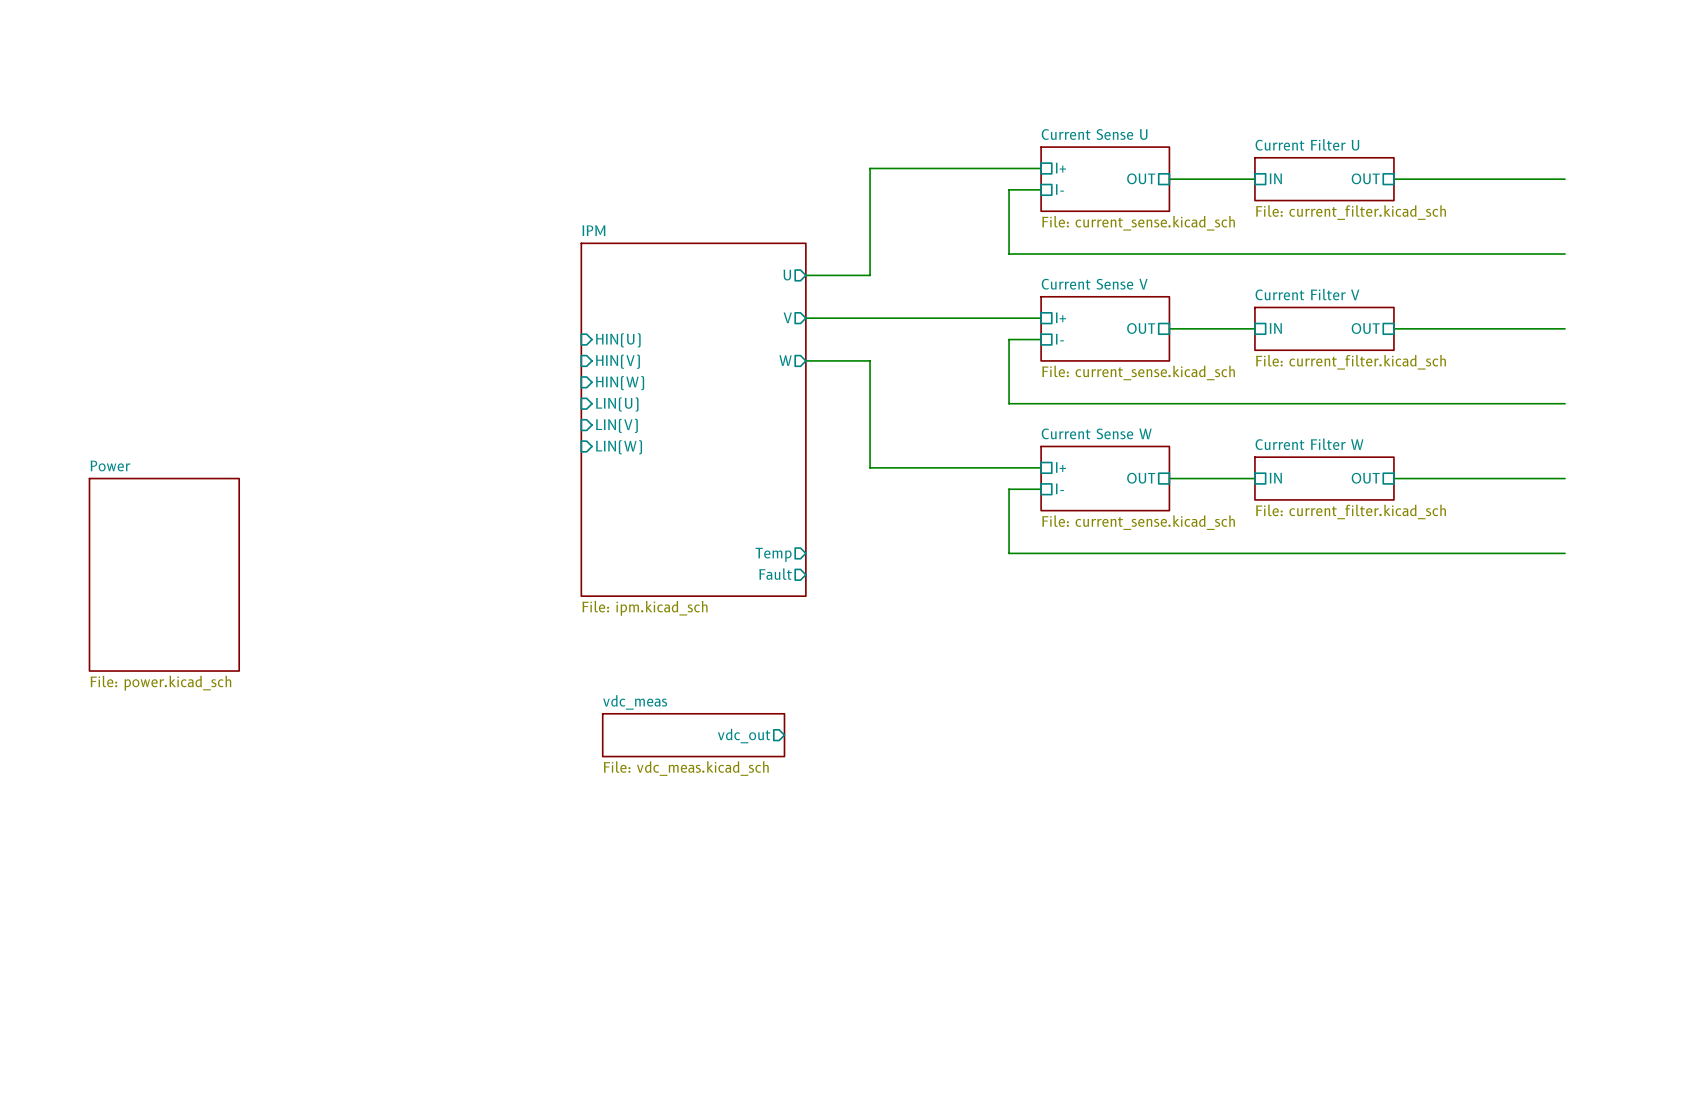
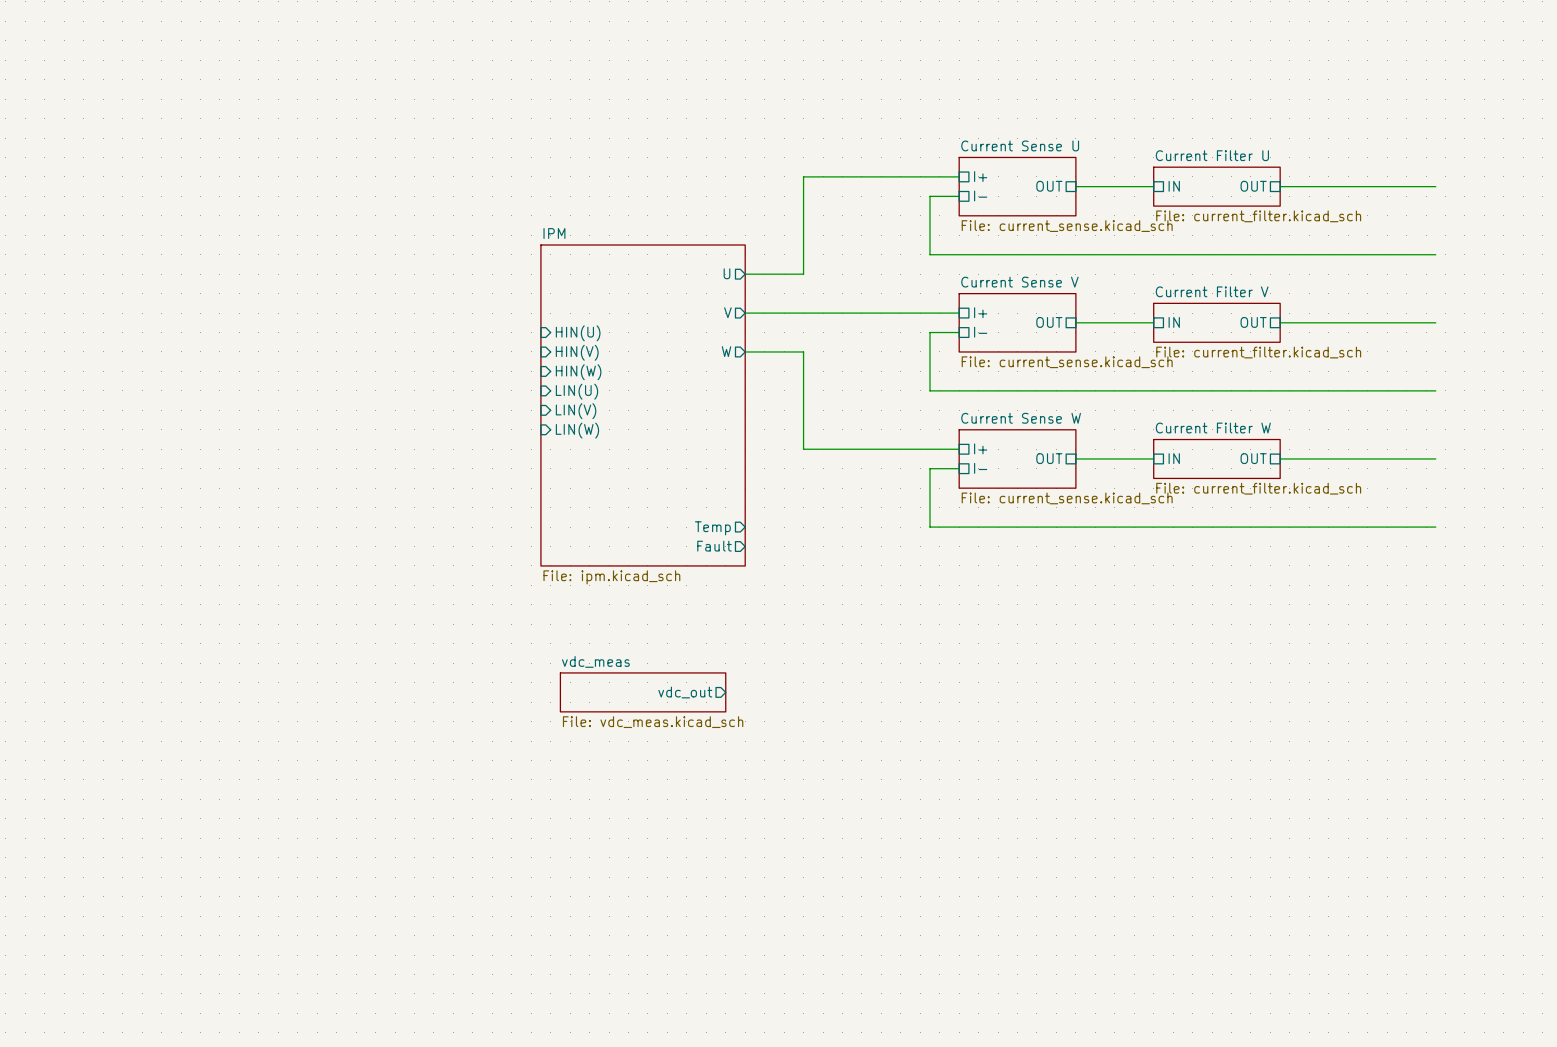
sheet Power: File: power.kicad_sch (164, 574) -> none

